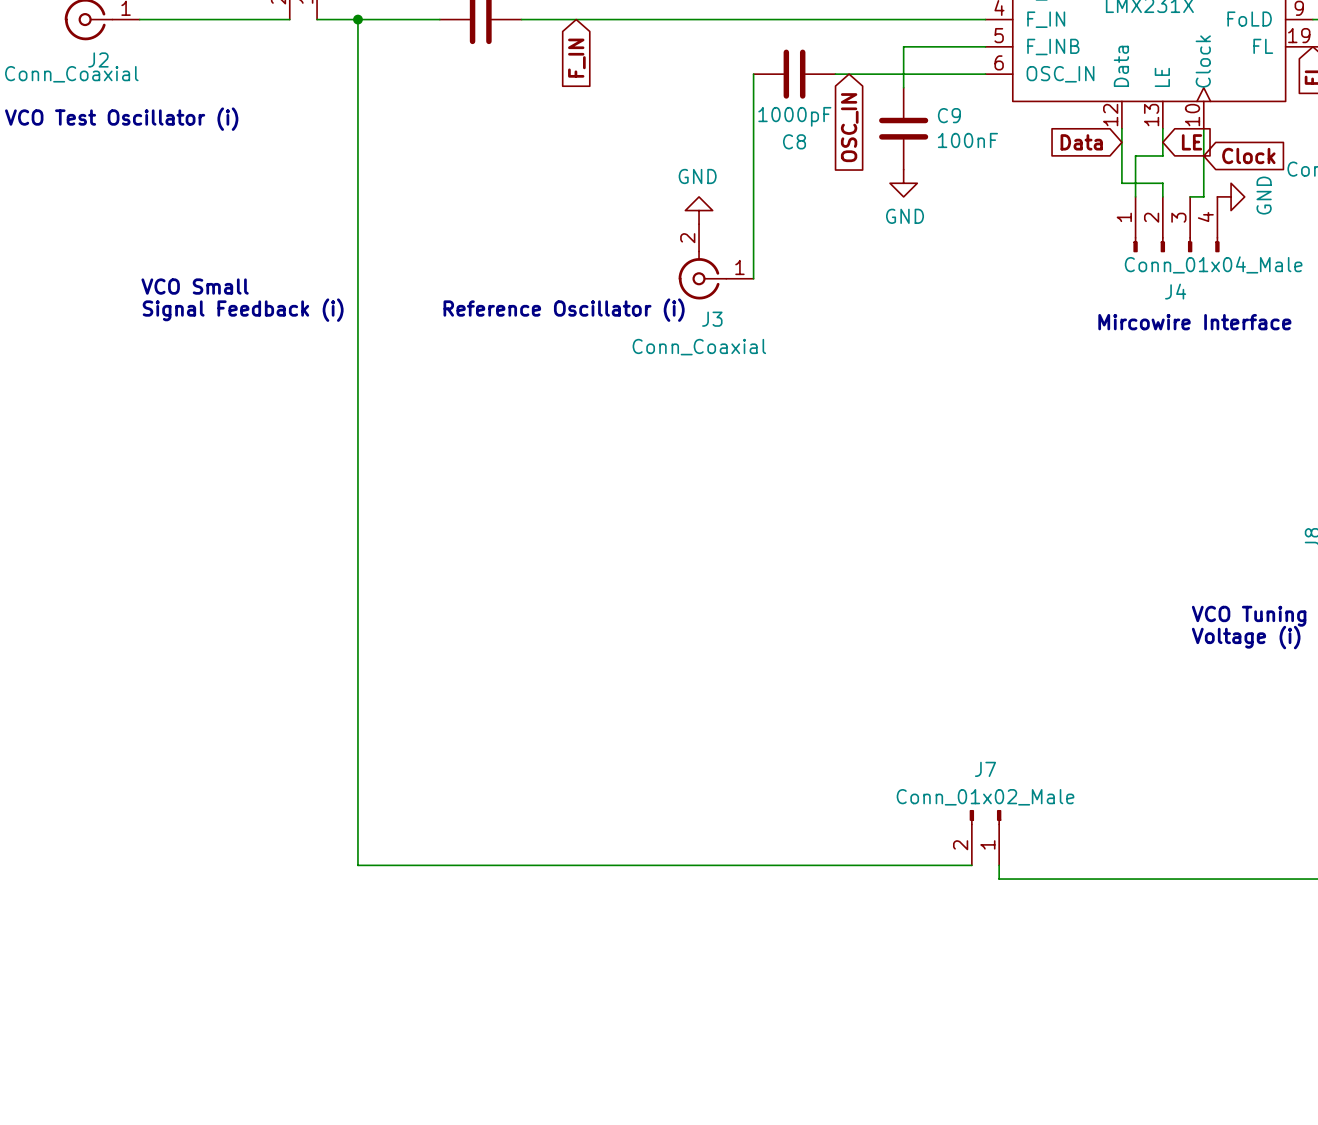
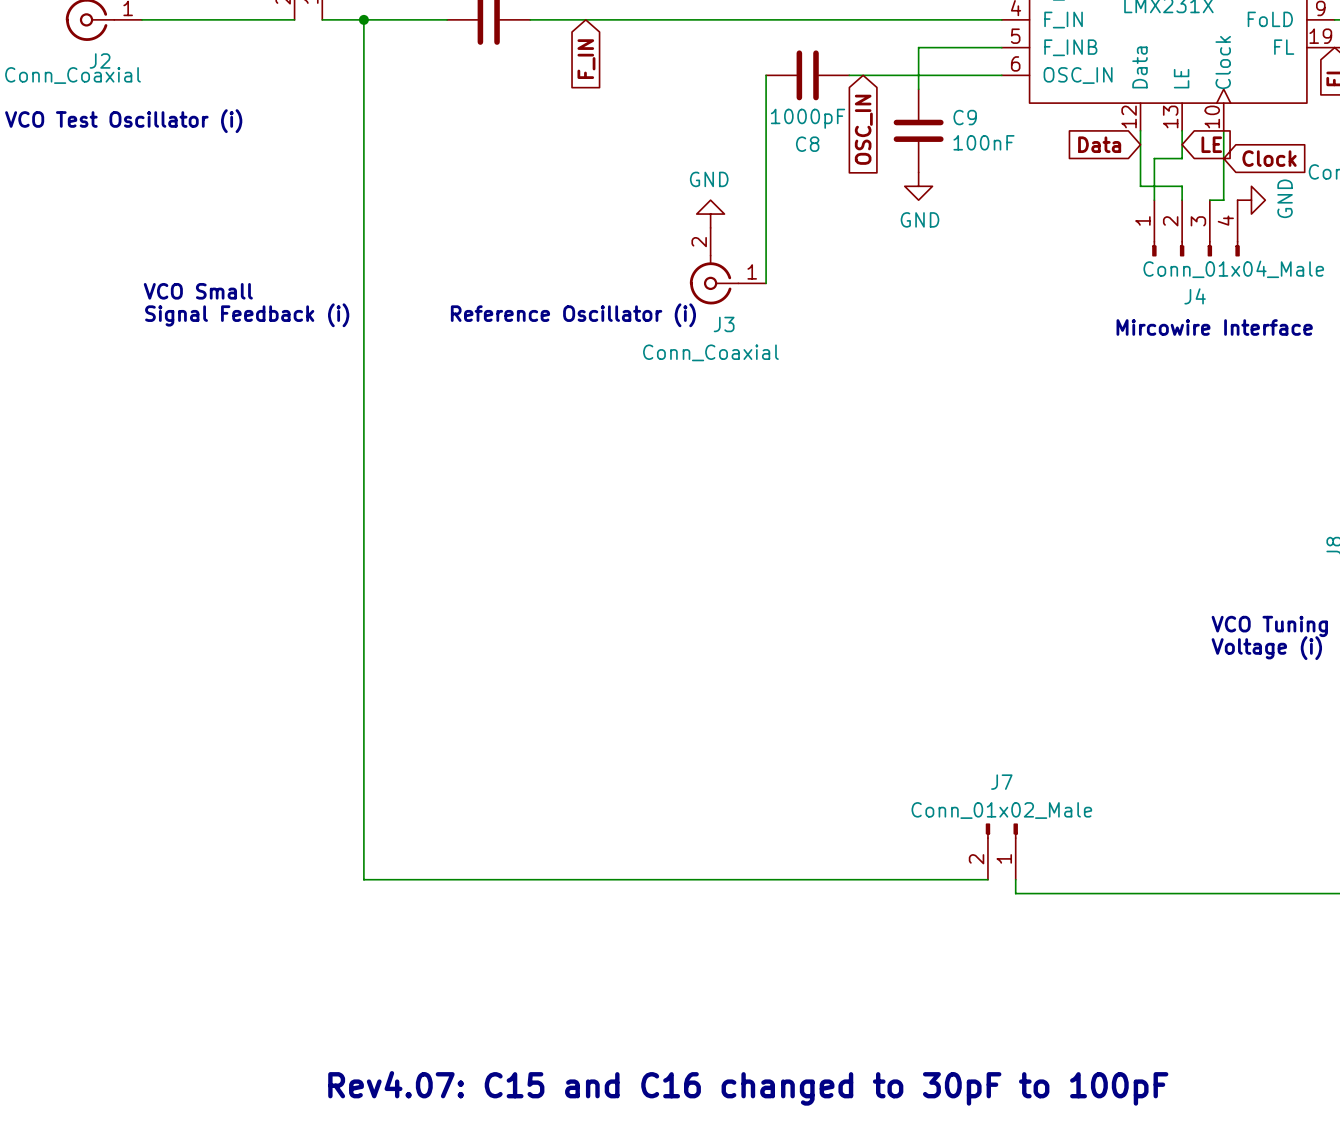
text: none -> Rev4.07: C15 and C16 changed to 30pF to 100pF (748, 1088)

